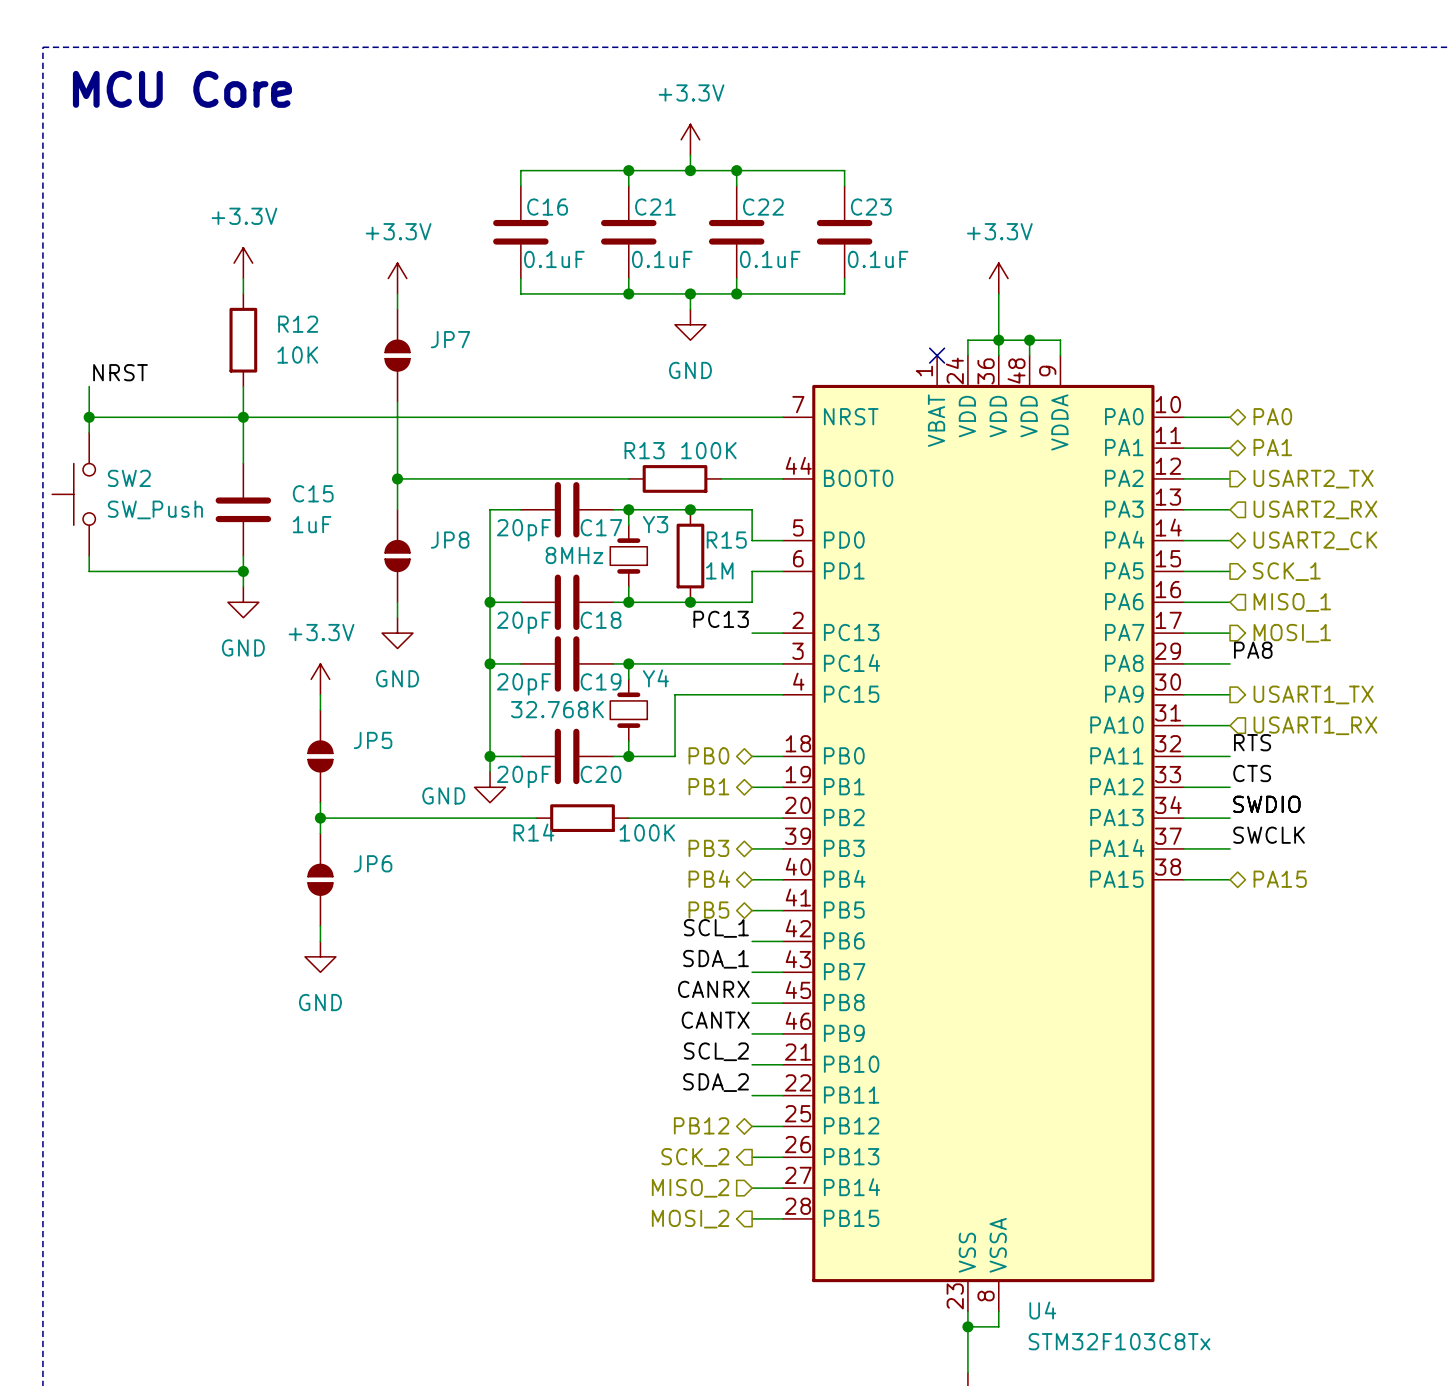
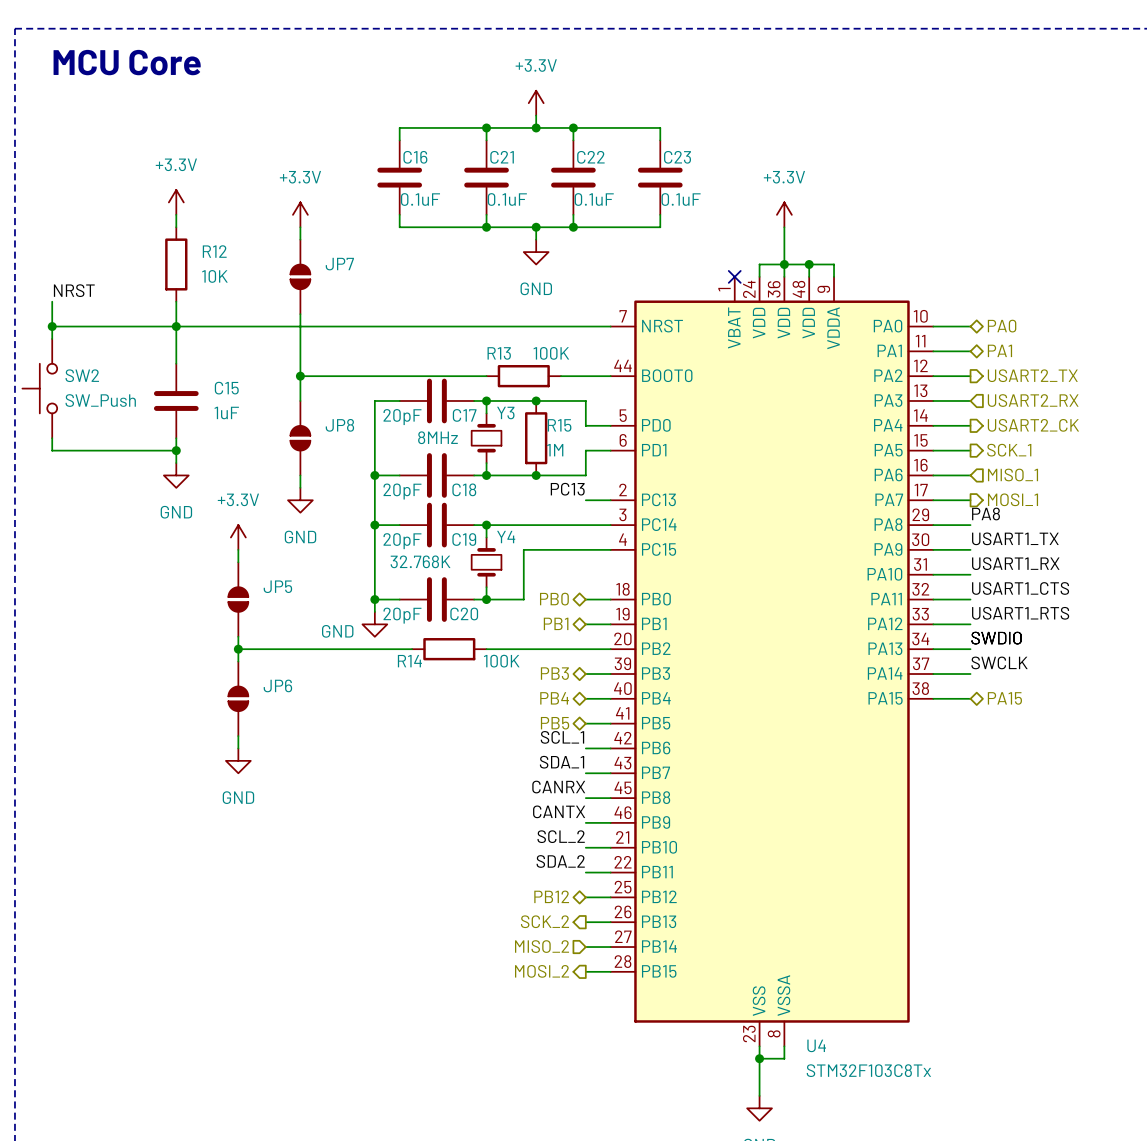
hierarchical label shape: bidirectional (1315, 540) -> output (1033, 425)
label: none -> USART1_TX (1015, 538)
hierarchical label: USART1_TX (1313, 694) -> none
label: none -> USART1_RX (1015, 563)
hierarchical label: USART1_RX (1315, 725) -> none
label: RTS (1252, 742) -> USART1_CTS (1020, 588)
label: CTS (1252, 773) -> USART1_RTS (1020, 613)

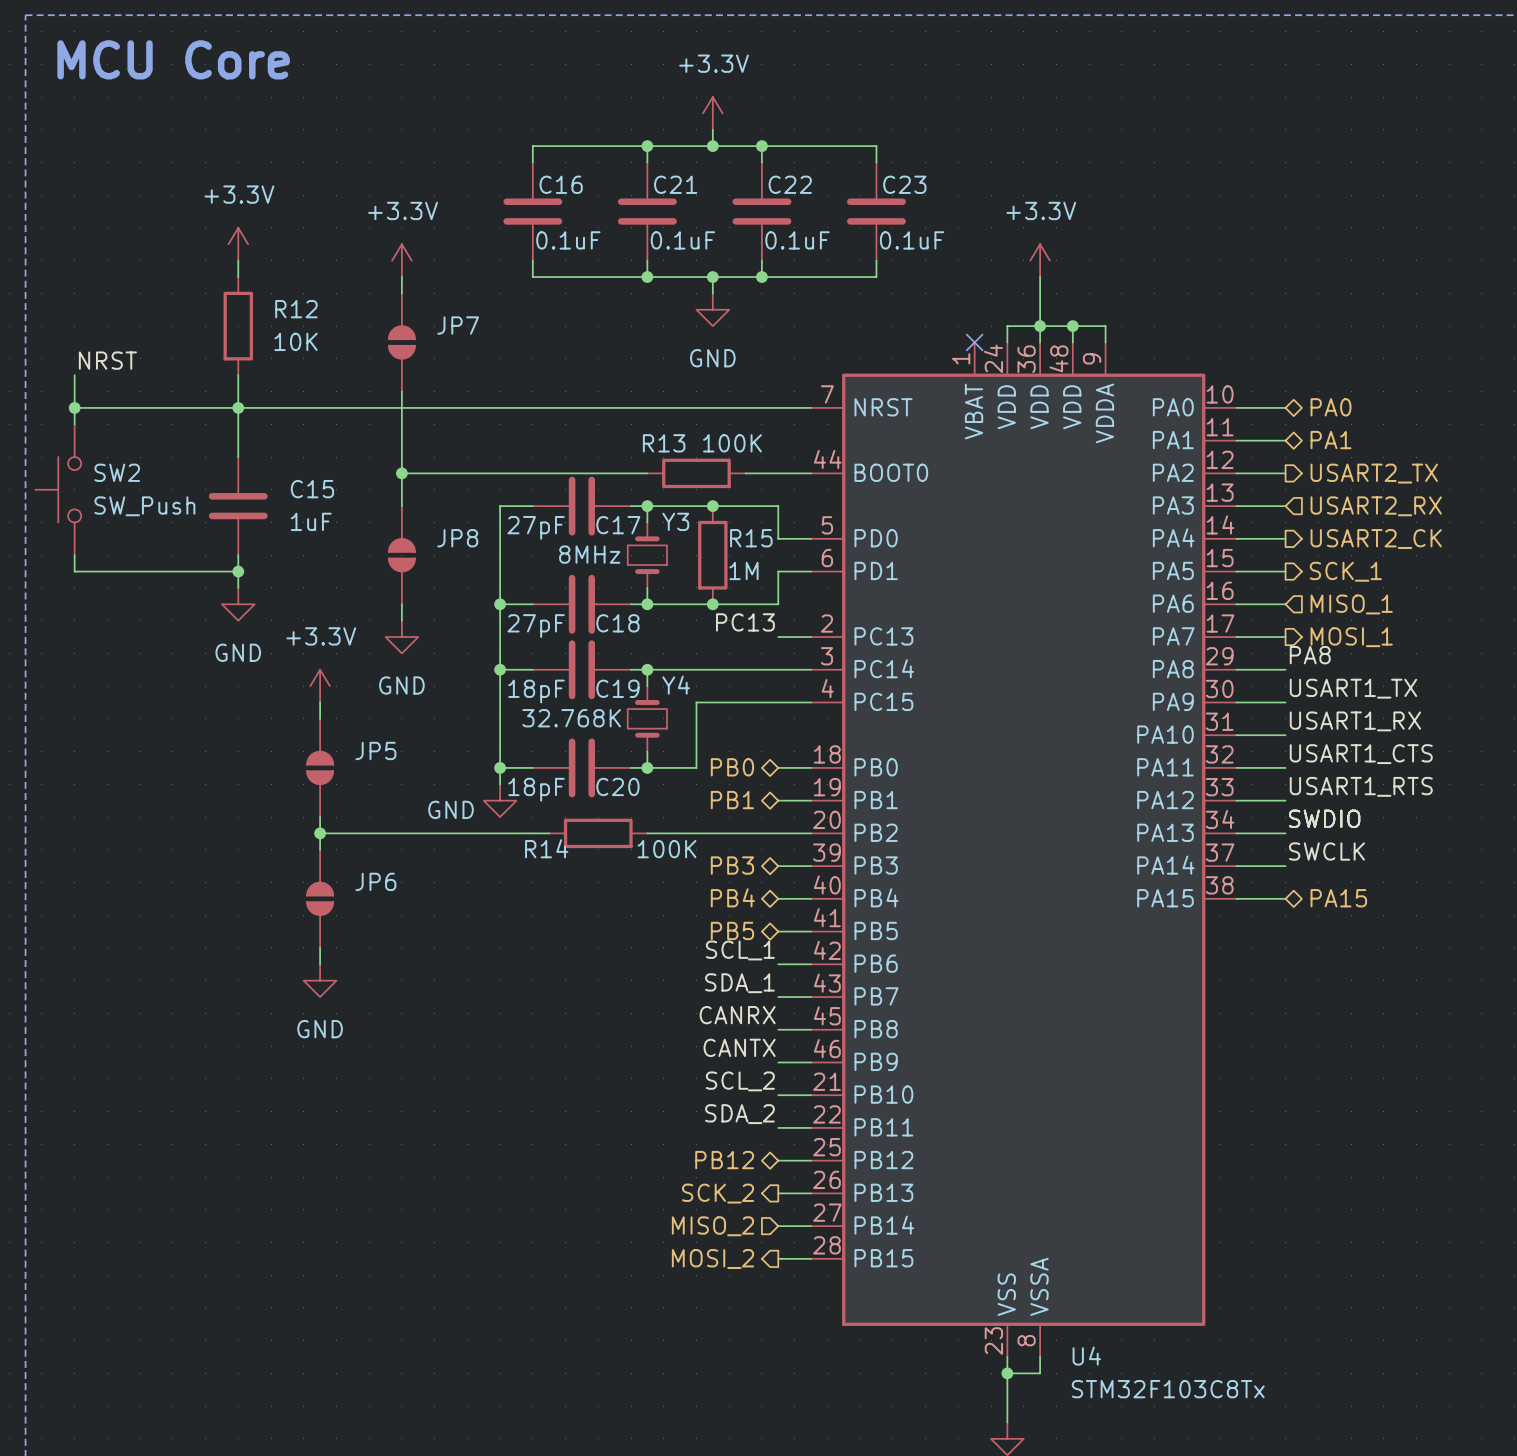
C17 value: 20pF (402, 417) -> 27pF (536, 527)
C18 value: 20pF (402, 491) -> 27pF (536, 626)
C19 value: 20pF (402, 541) -> 18pF (536, 691)
C20 value: 20pF (402, 615) -> 18pF (536, 789)

